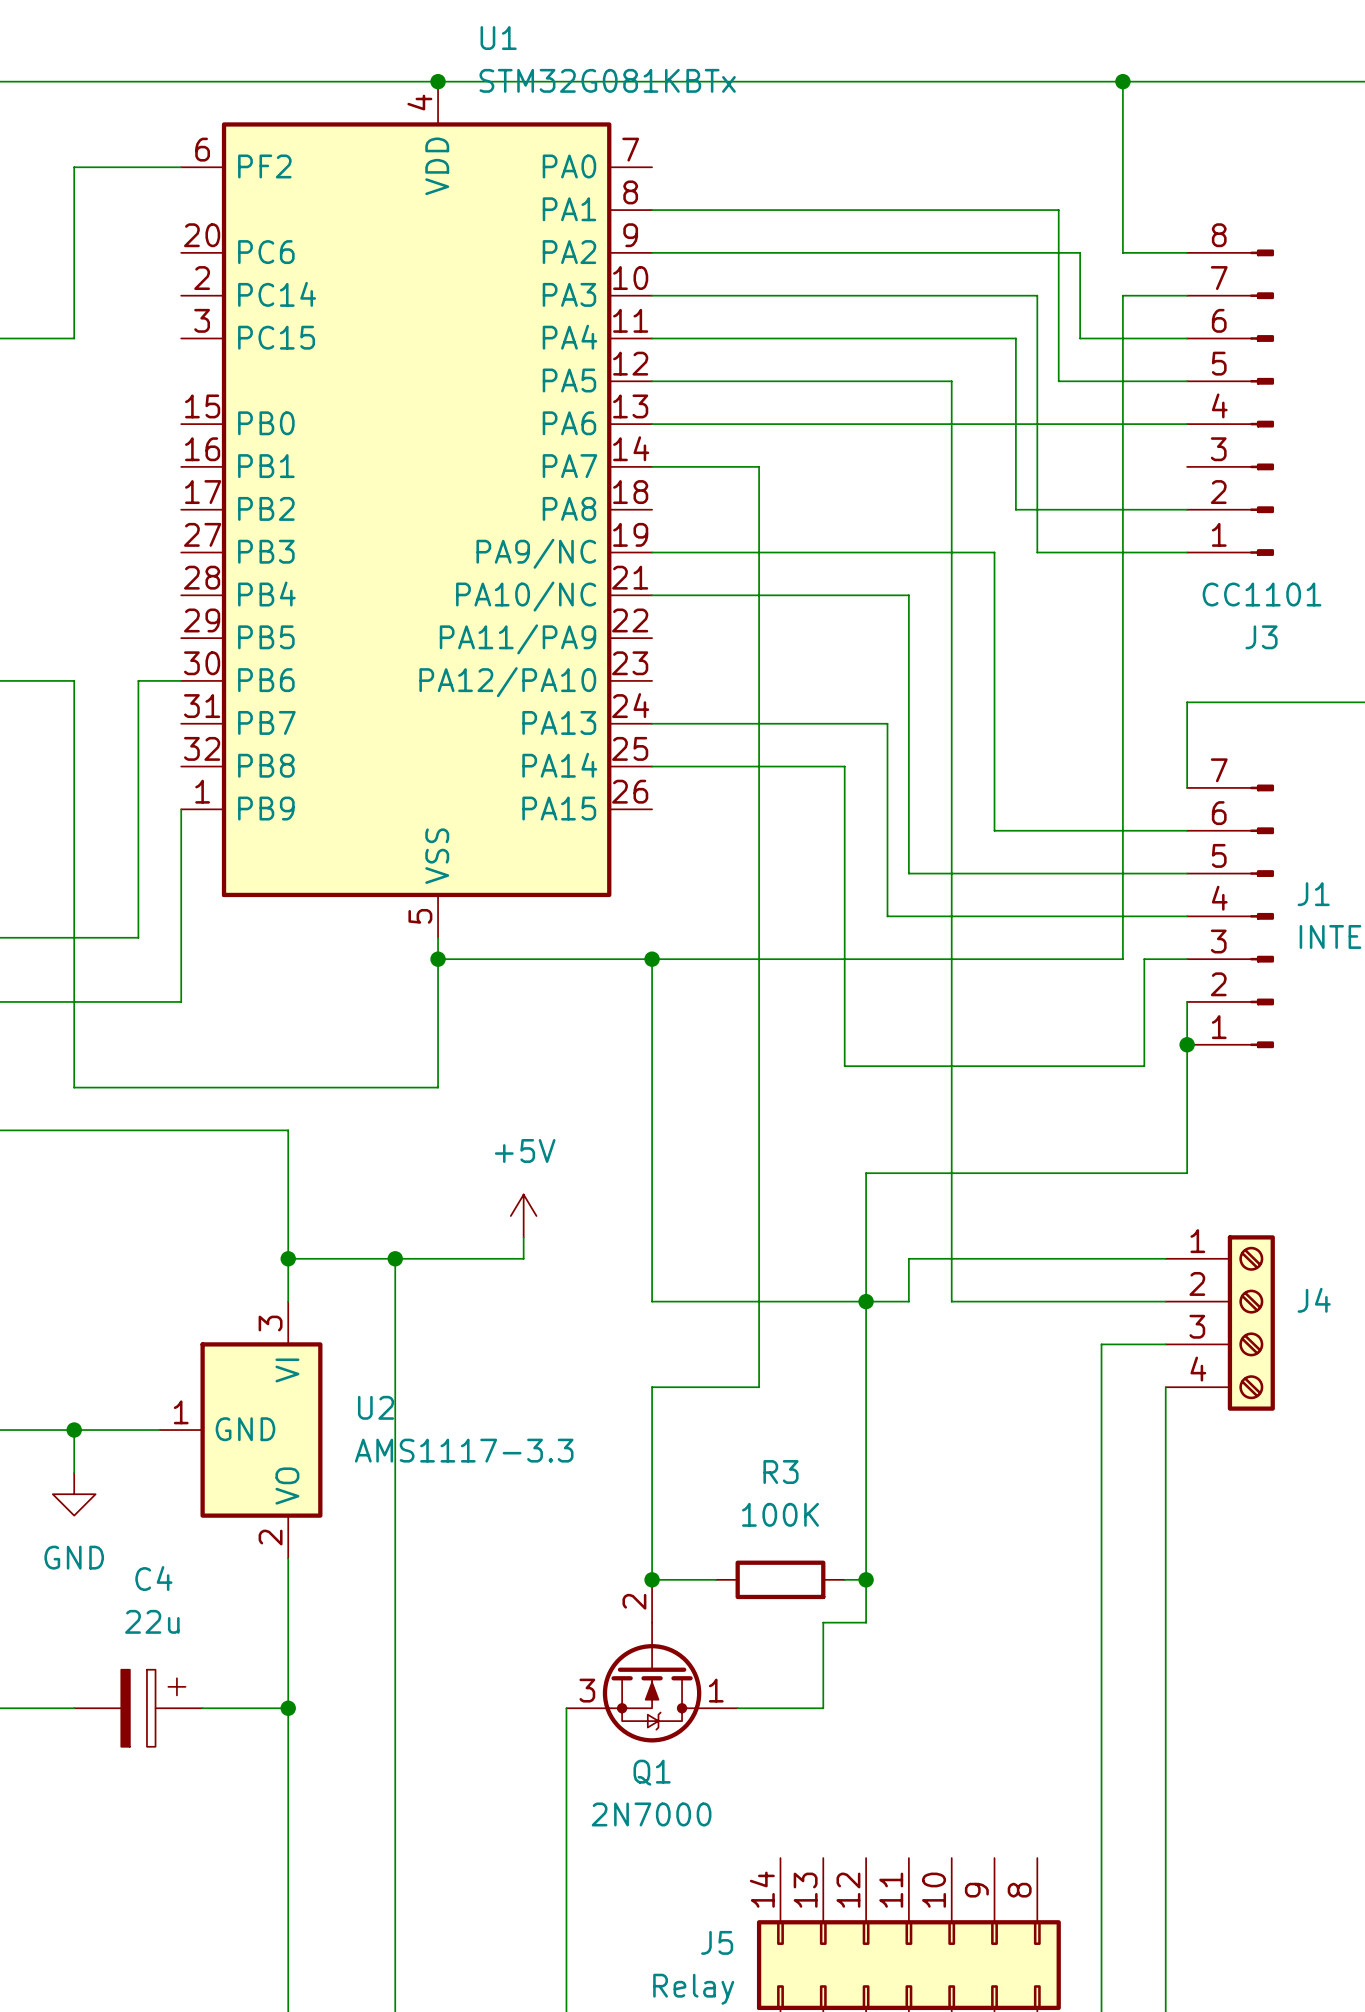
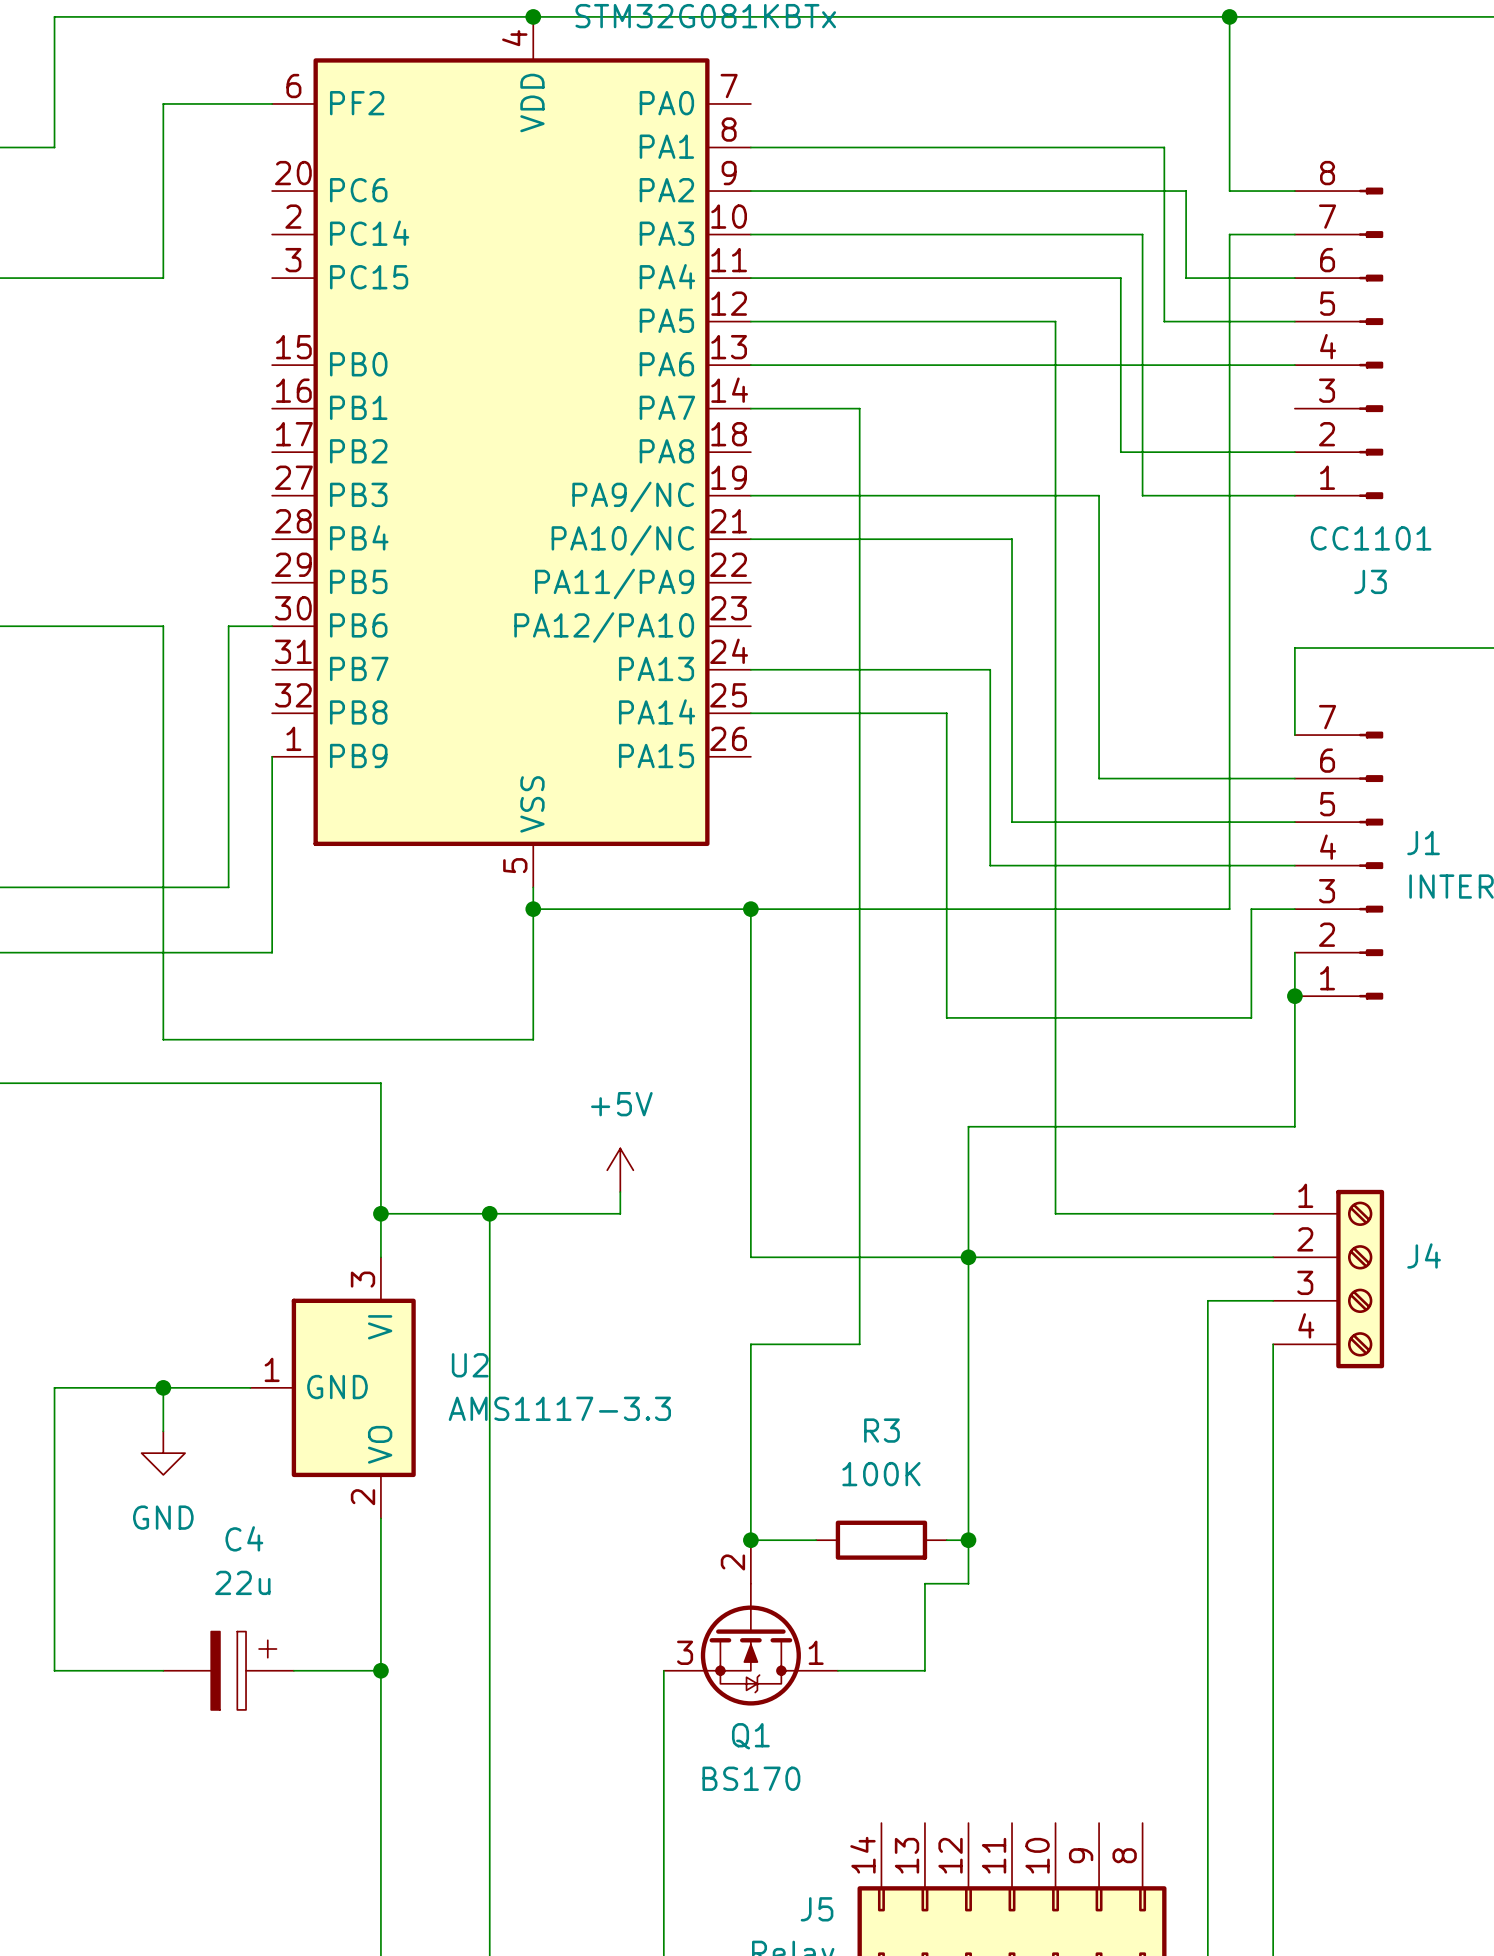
wire: (908, 1301) (908, 1258) (951, 1258) (951, 1301) -> (1012, 1257) (1055, 1257)
Q1 value: 2N7000 (651, 1814) -> BS170 (751, 1778)

